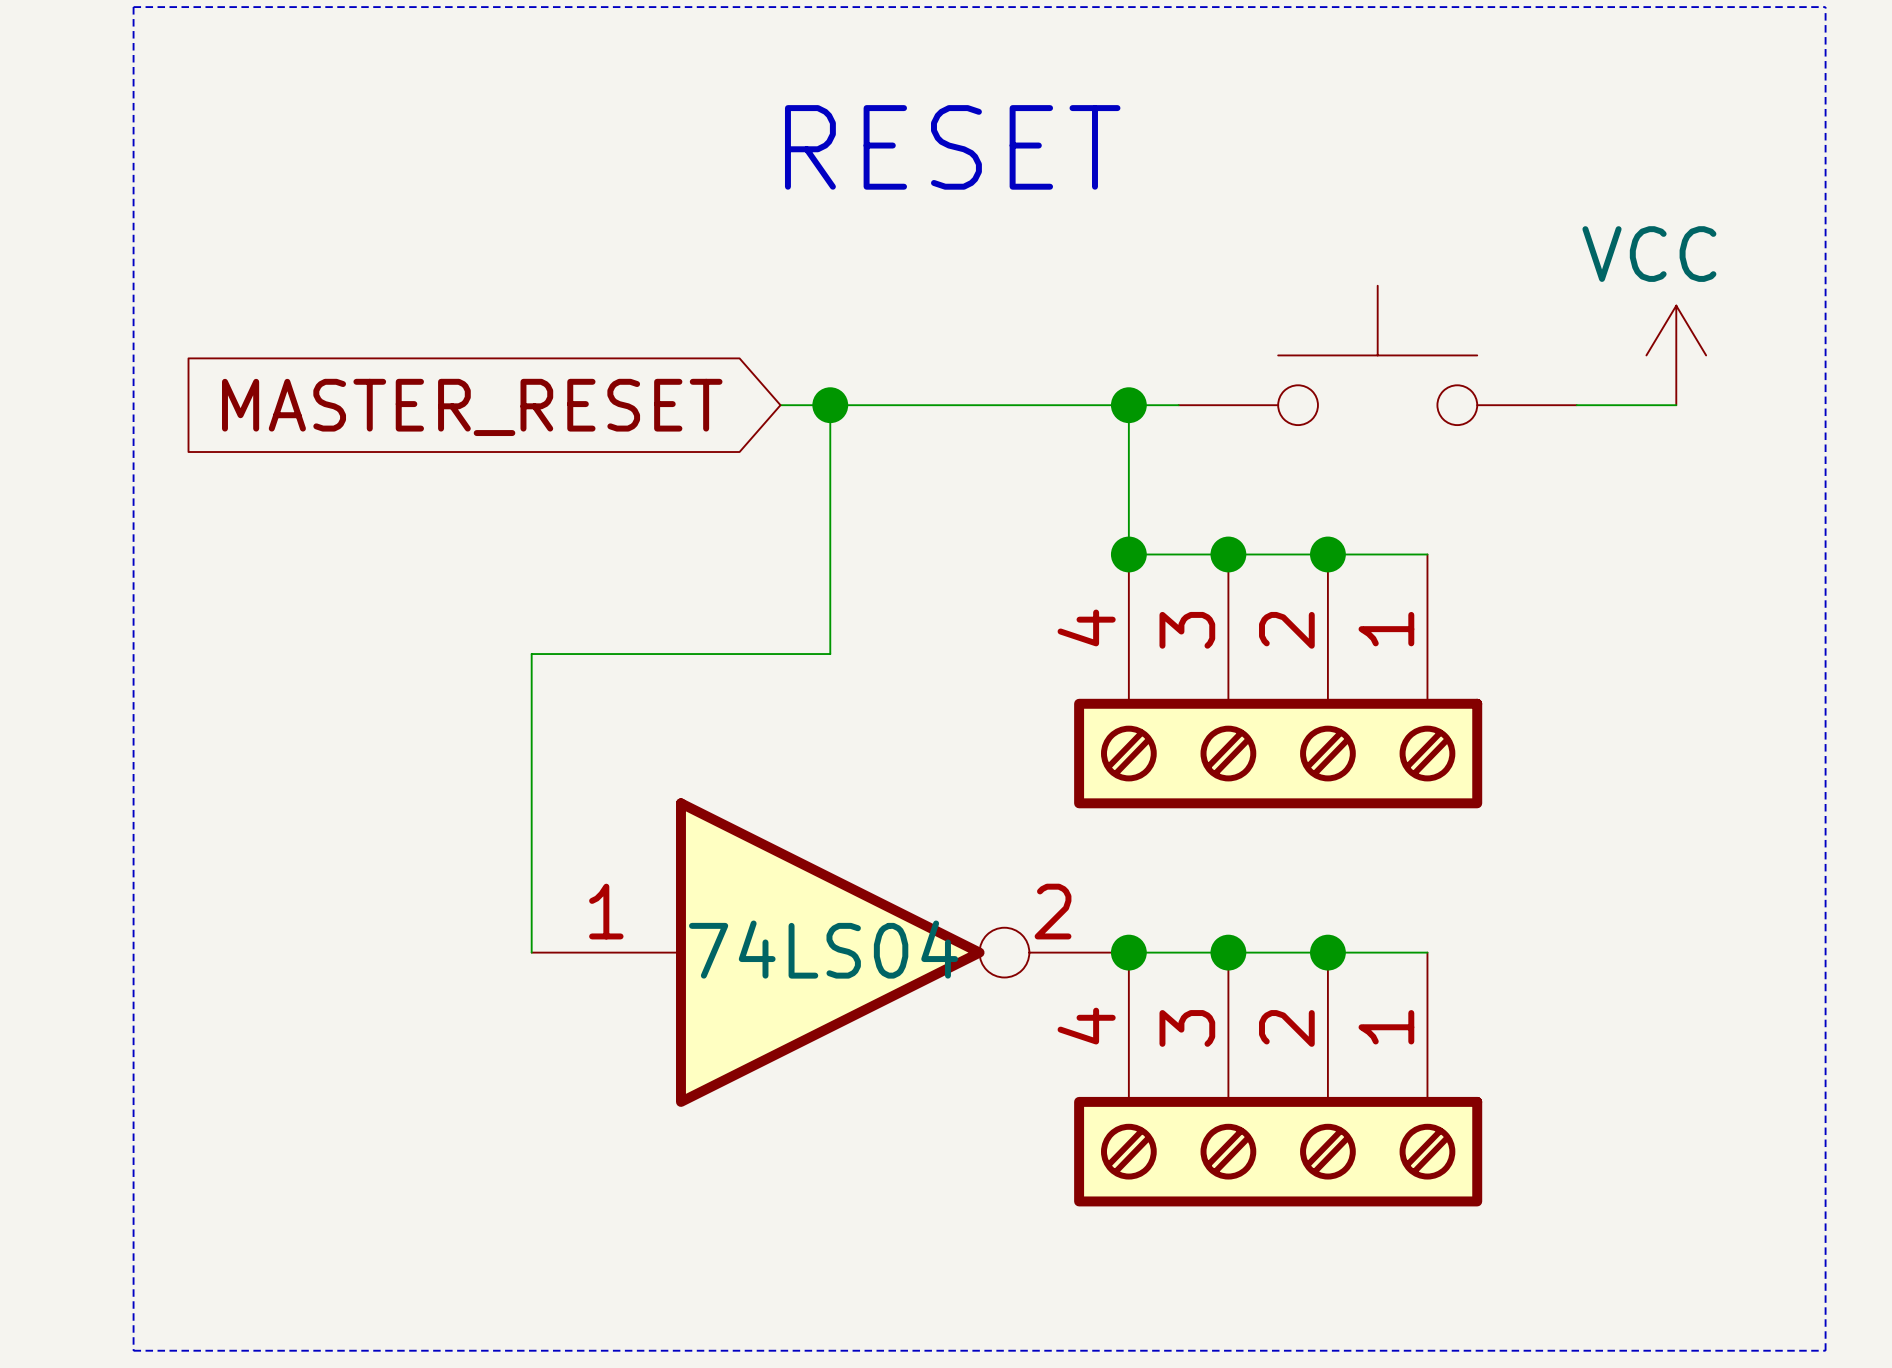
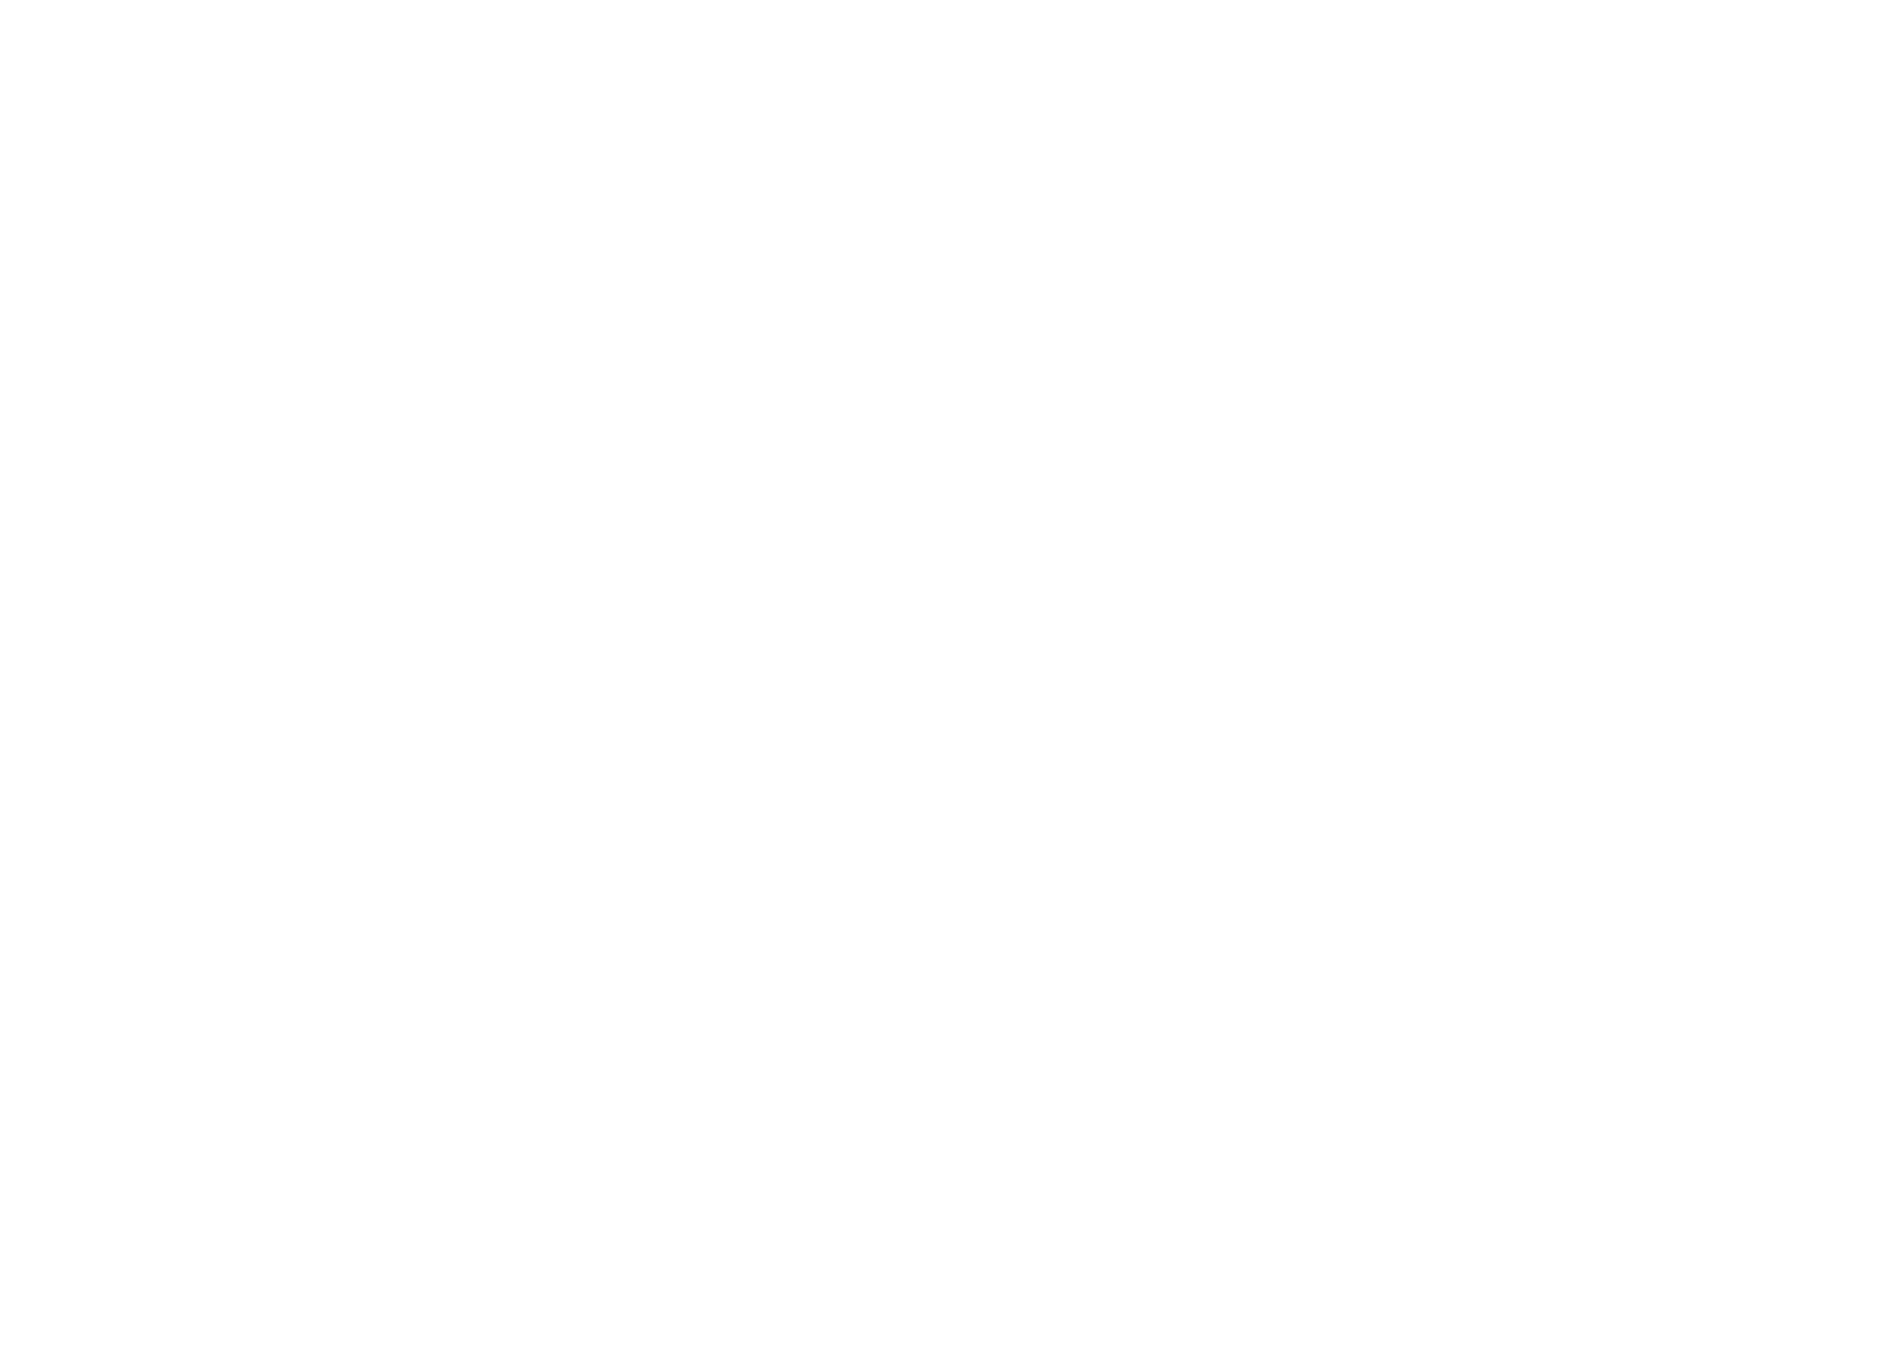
line: (133, 7) (133, 1350) (1825, 1350) (1825, 7) (133, 7) -> none
text: RESET (952, 147) -> none
part: (1377, 355) -> none
power symbol: VCC (1676, 355) -> none
wire: (780, 405) (1178, 405) -> none
wire: (830, 405) (830, 654) (531, 654) (531, 952) -> none
junction: (830, 405) -> none
wire: (1128, 405) (1128, 554) (1427, 554) -> none
junction: (1128, 405) -> none
wire: (1576, 405) (1676, 405) -> none
global label: MASTER_RESET (472, 407) -> none
junction: (1128, 554) -> none
junction: (1228, 554) -> none
junction: (1327, 554) -> none
part: (1278, 681) -> none
part: 74LS04 (830, 952) -> none
wire: (1128, 952) (1427, 952) -> none
junction: (1128, 952) -> none
junction: (1228, 952) -> none
junction: (1327, 952) -> none
part: (1278, 1079) -> none

